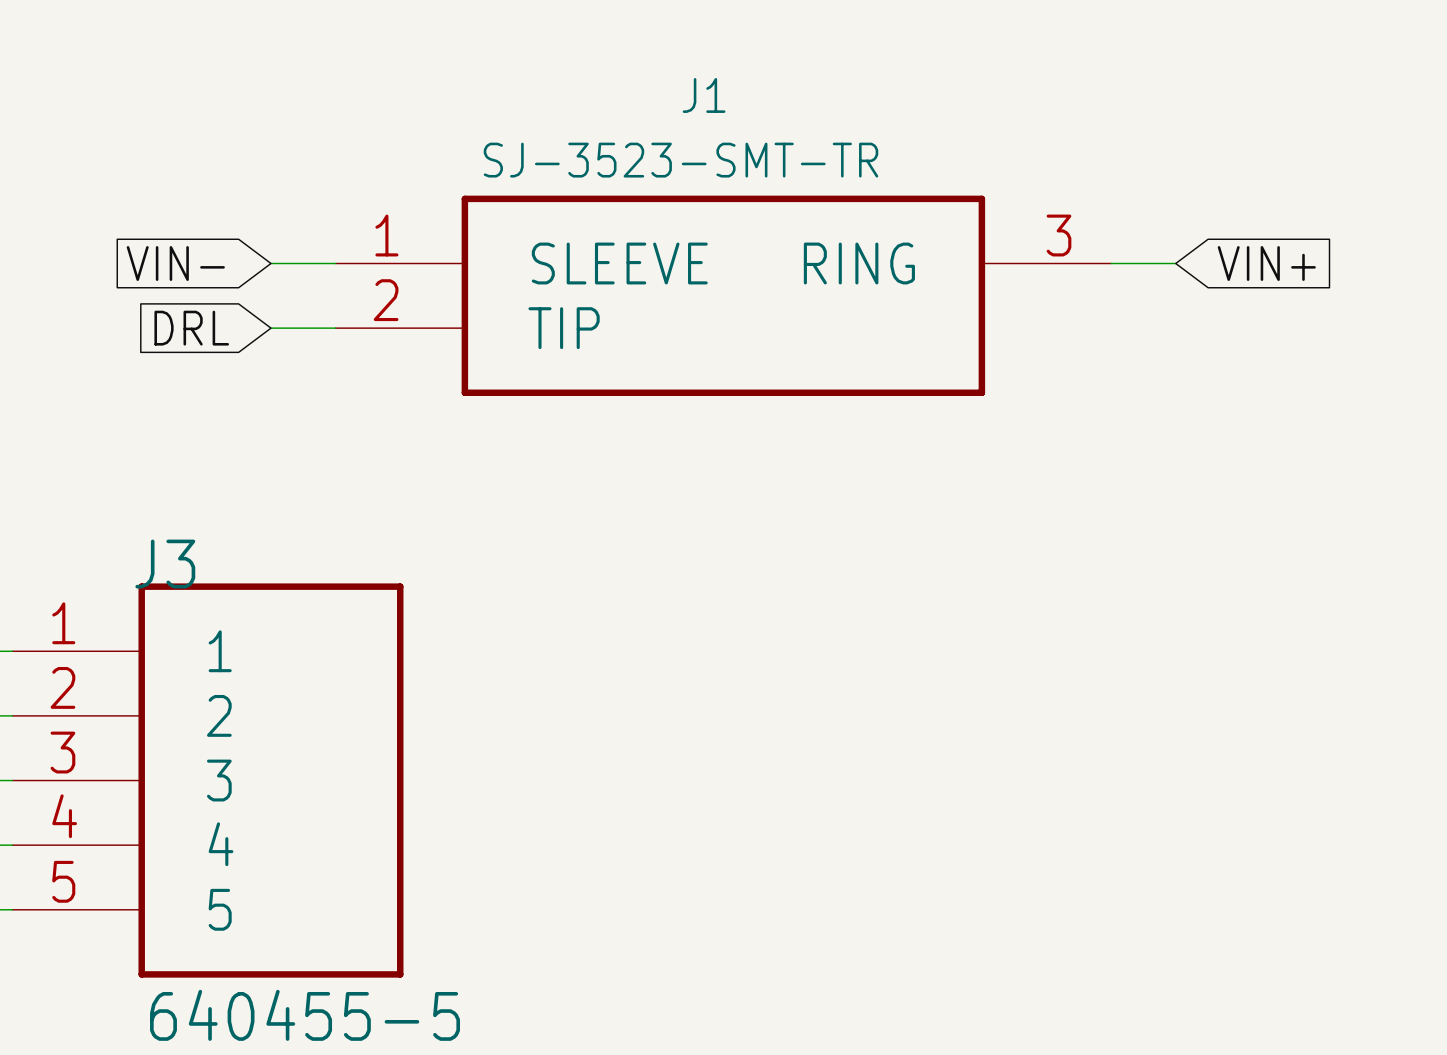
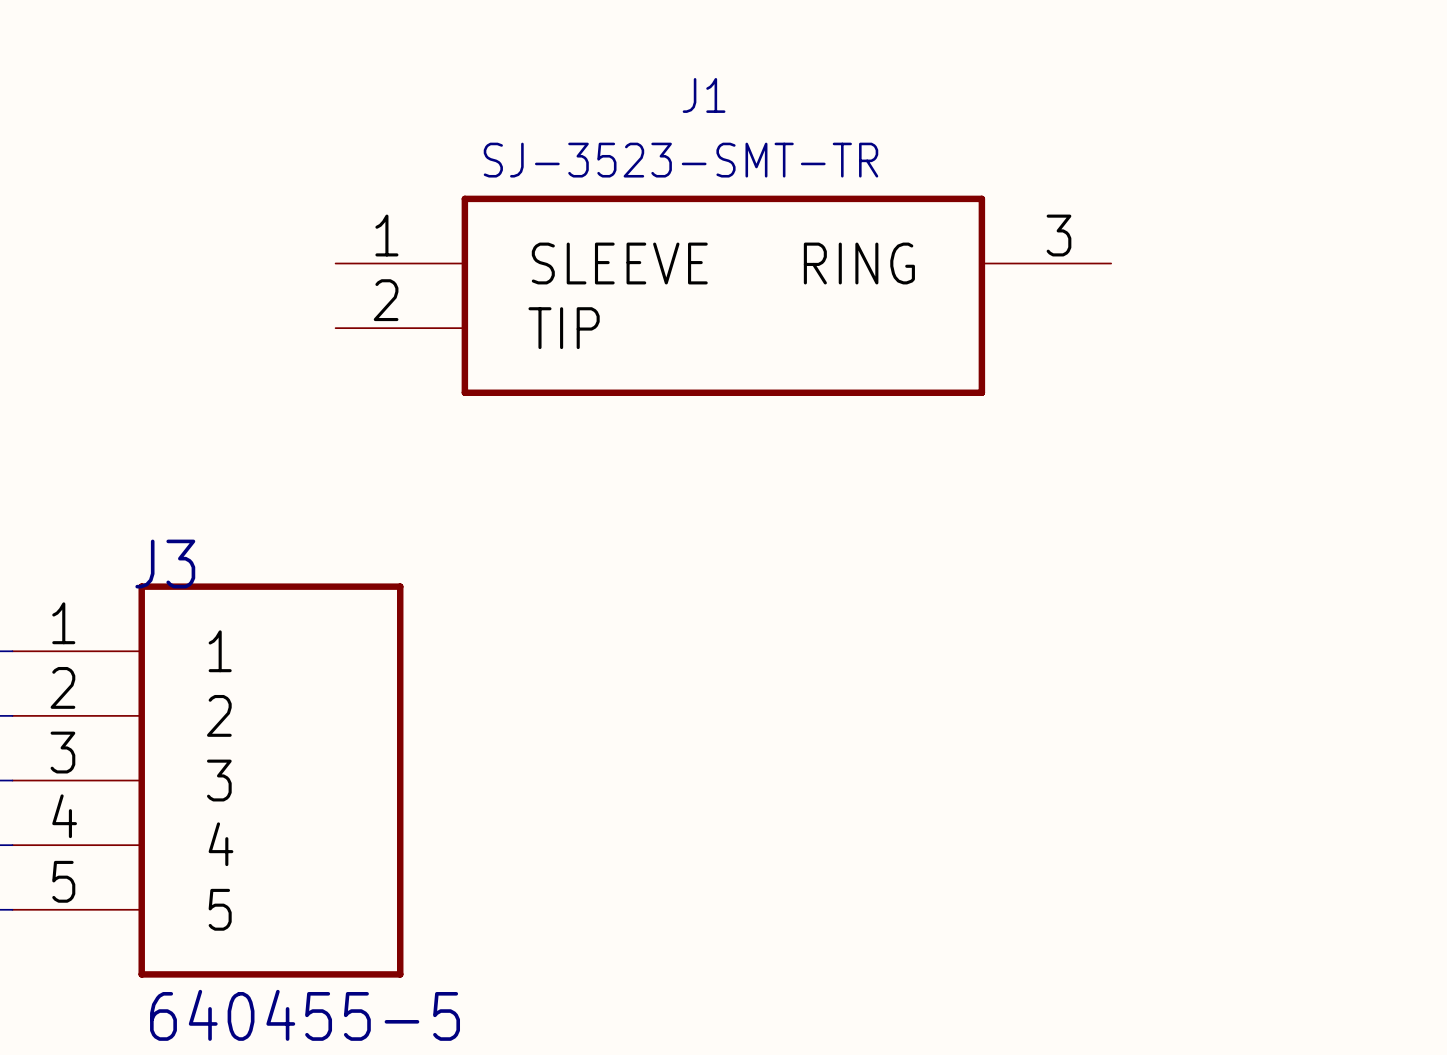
global label: VIN- (175, 263) -> none
wire: (270, 263) (335, 263) -> none
wire: (1111, 263) (1175, 263) -> none
global label: VIN+ (1266, 263) -> none
global label: DRL (191, 328) -> none
wire: (270, 328) (335, 328) -> none

